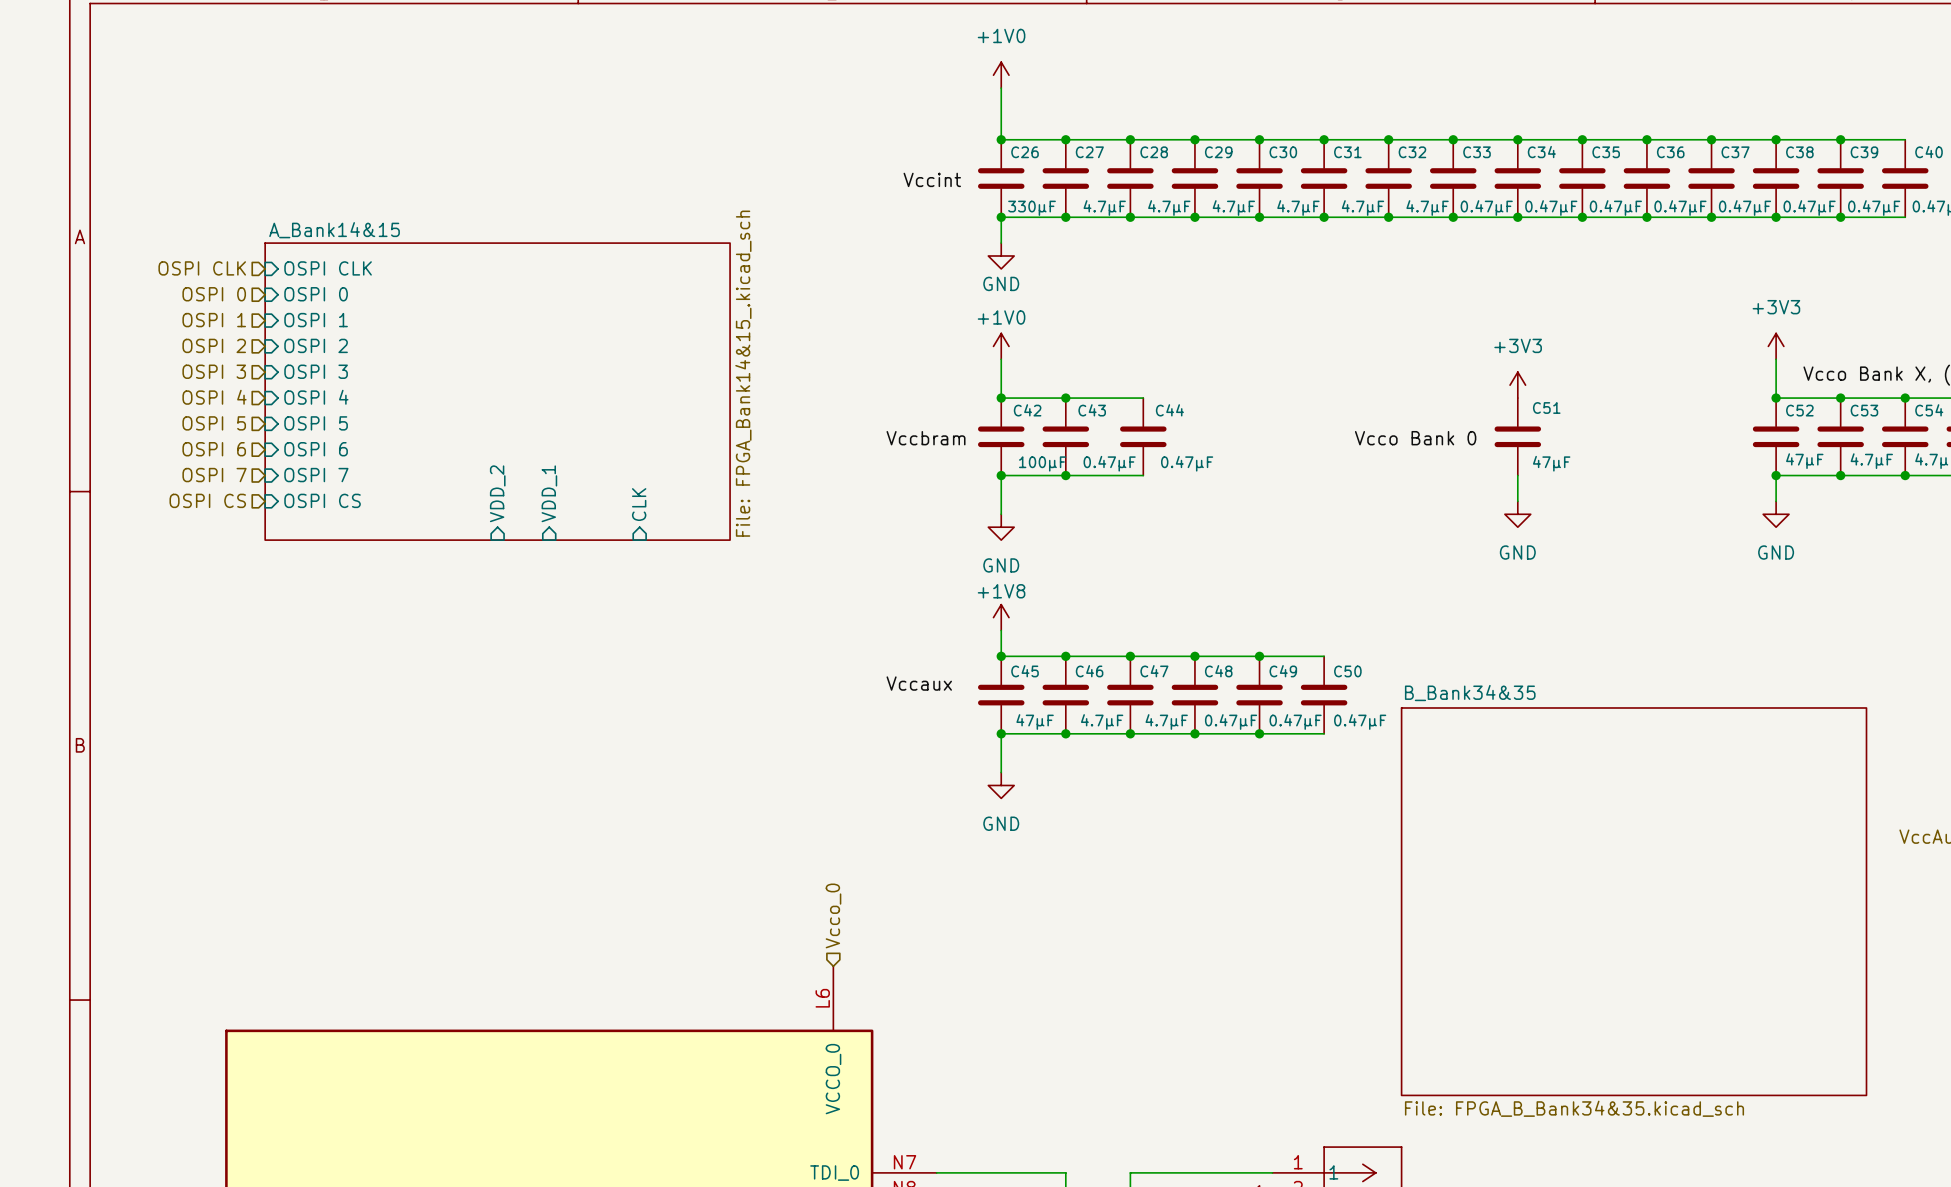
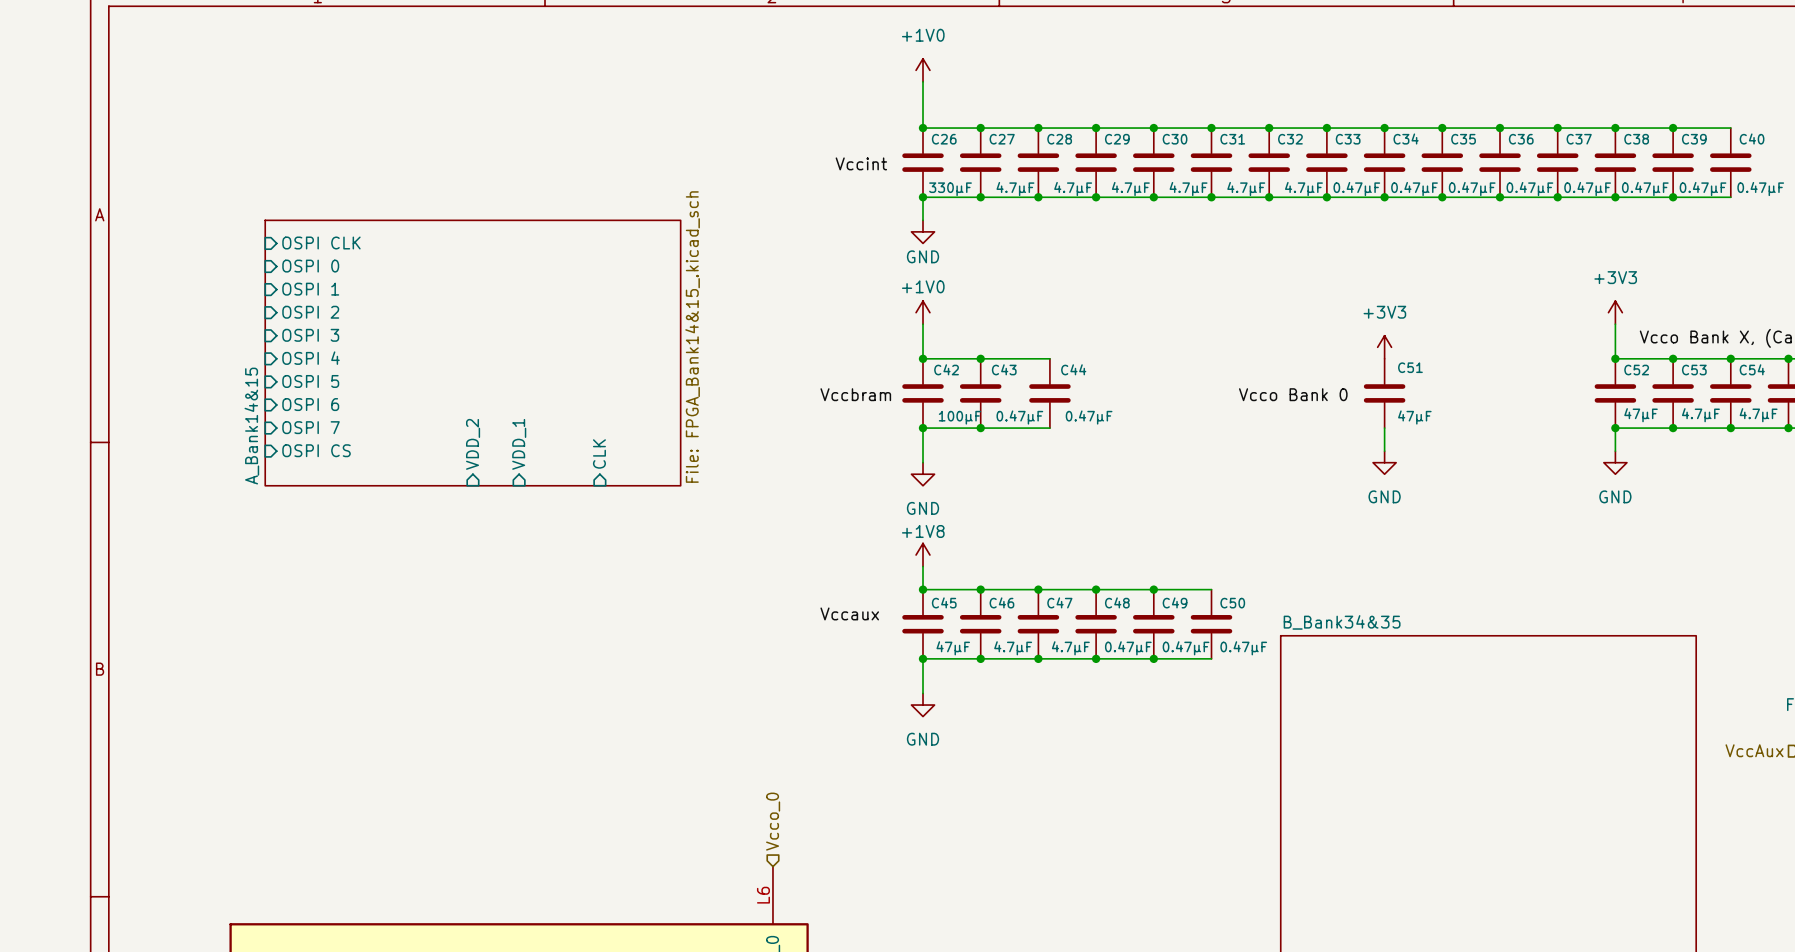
sheet A_Bank14&15 name rotation: 0° (334, 230) -> 90° counterclockwise (251, 426)
sheet A_Bank14&15 name position: A_Bank14&15 (334, 230) -> A_Bank14&15 (251, 426)
hierarchical label: OSPI CLK (202, 268) -> none
hierarchical label: OSPI 0 (214, 294) -> none
hierarchical label: OSPI 1 (214, 320) -> none
hierarchical label: OSPI 2 (214, 345) -> none
hierarchical label: OSPI 3 (214, 371) -> none
hierarchical label: OSPI 4 (214, 397) -> none
hierarchical label: OSPI 5 (214, 423) -> none
hierarchical label: OSPI 6 (214, 449) -> none
hierarchical label: OSPI 7 (214, 475) -> none
hierarchical label: OSPI CS (207, 500) -> none

